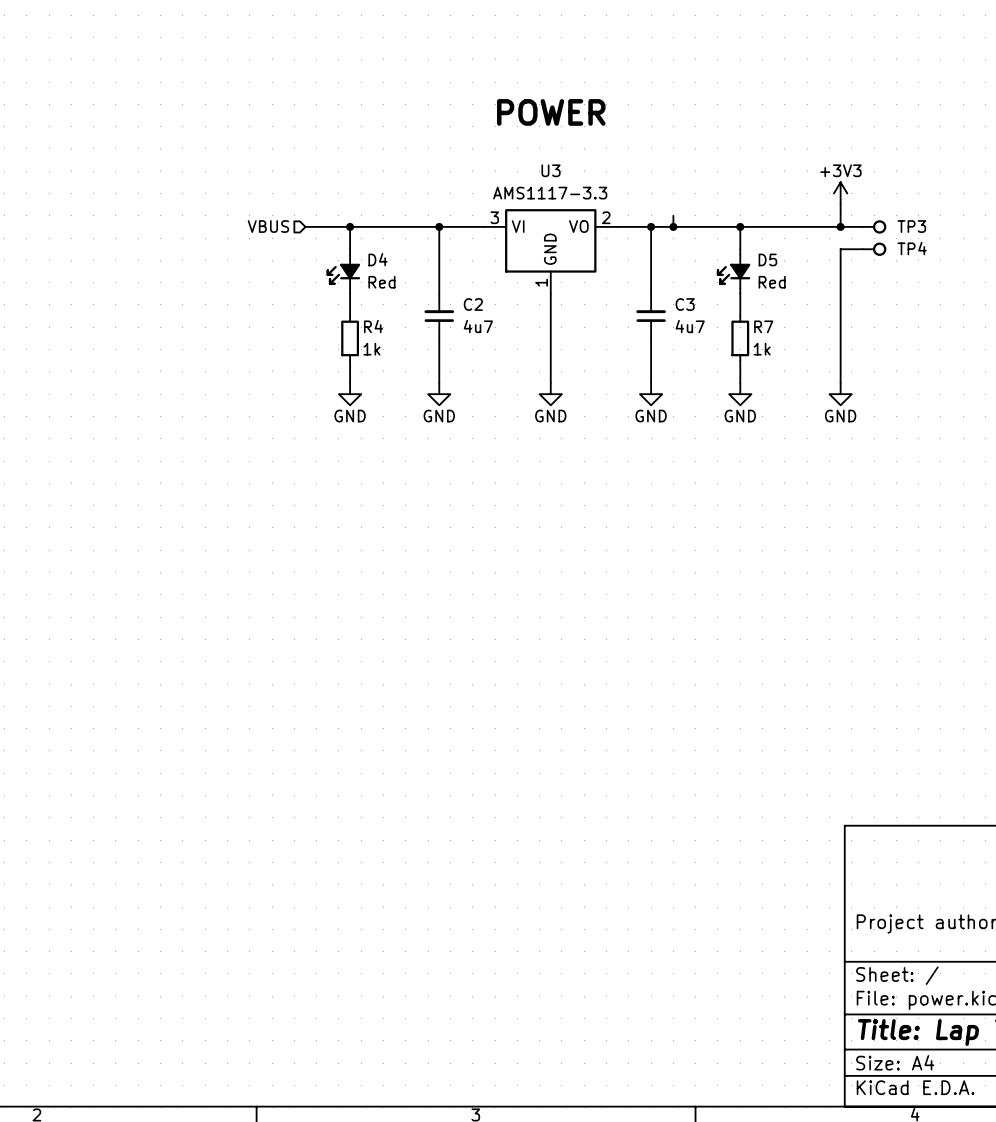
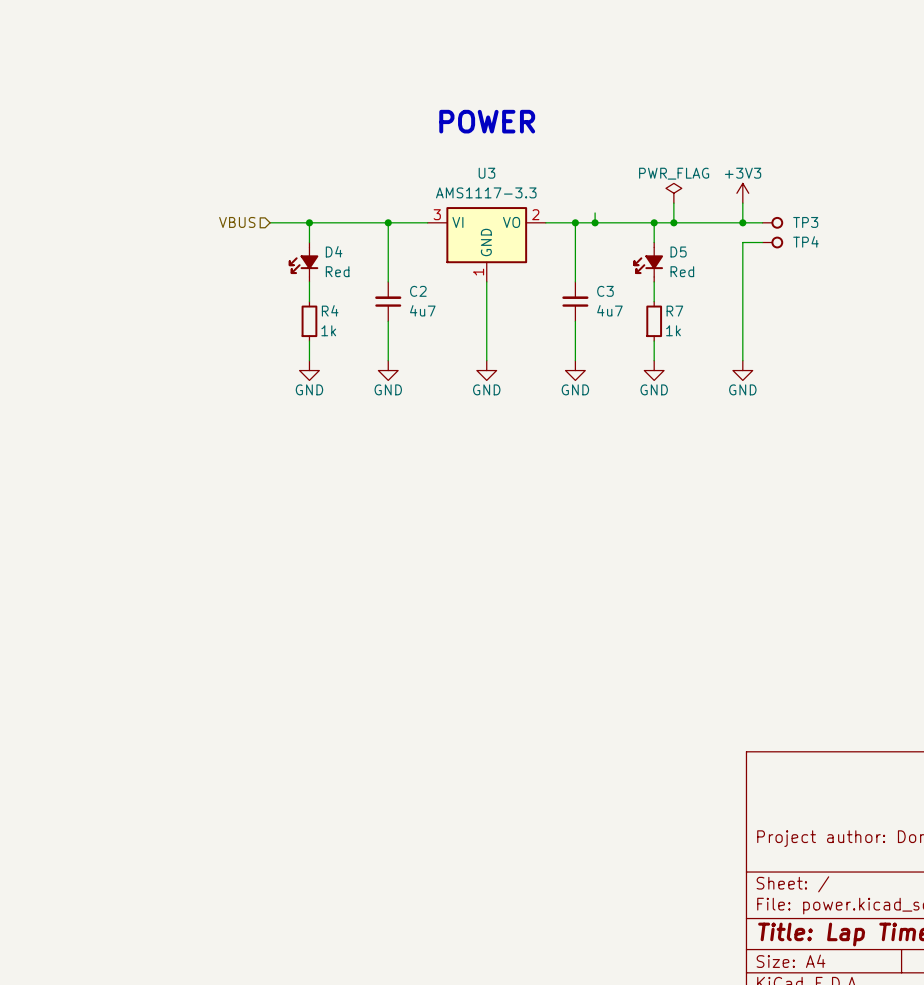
power symbol: none -> PWR_FLAG (673, 193)
wire: none -> (673, 203) (673, 222)
junction: none -> (673, 222)

